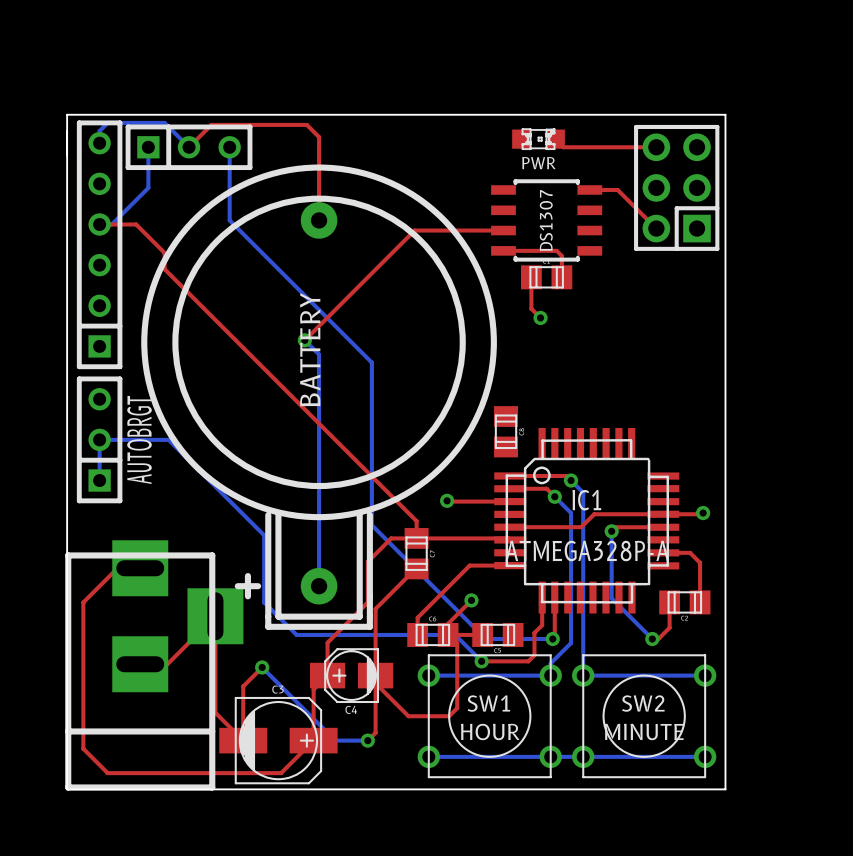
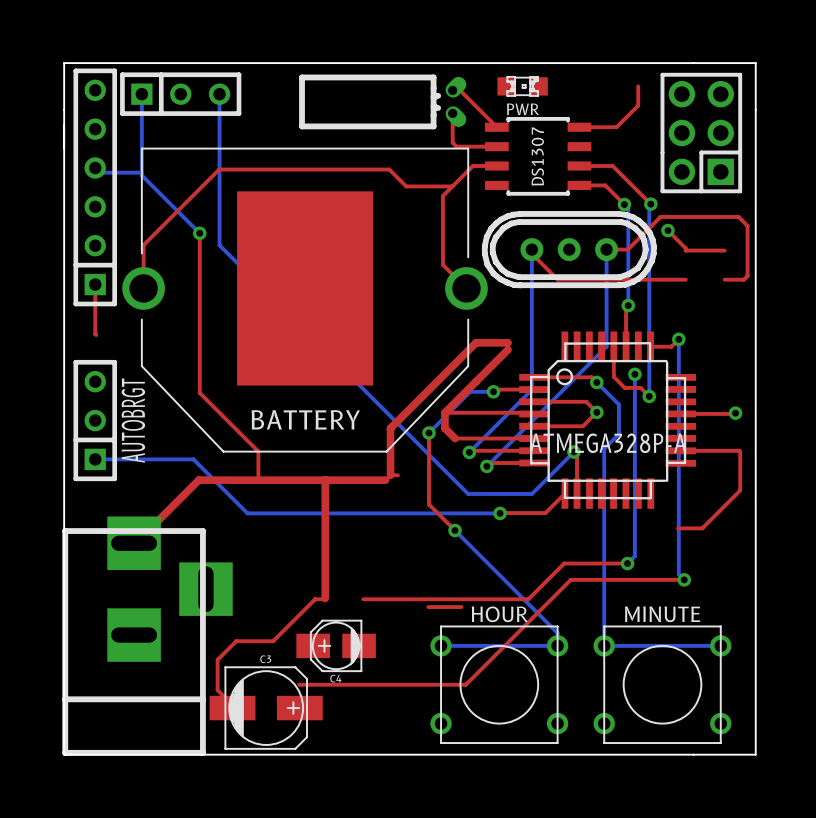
top track: none -> (638, 86) (638, 105) (616, 127) (579, 127)
top track: none -> (452, 90) (460, 90) (496, 127)
bottom track: none -> (141, 94) (141, 140)
bottom track: none -> (219, 94) (219, 140)
part: none -> (382, 101)
board edge: (67, 114) (725, 114) (725, 789) -> (64, 109) (64, 63) (755, 63) (755, 754) (693, 754)
top track: none -> (452, 113) (452, 142) (456, 146) (496, 146)
part position: (538, 139) -> (522, 86)
top track: (555, 139) (563, 147) (656, 147) -> none
bottom track: (99, 143) (99, 131) (107, 122) (164, 122) (189, 147) -> none
top track: (189, 147) (211, 124) (306, 124) (319, 137) (319, 220) -> none
part position: (189, 147) -> (180, 94)
top track: none -> (496, 166) (472, 166) (442, 195) (442, 264) (466, 288)
top track: none -> (579, 166) (612, 166) (650, 204)
bottom track: none -> (95, 167) (99, 172) (141, 172)
bottom track: (148, 183) (148, 187) (111, 224) (99, 224) -> (141, 175) (199, 233)
part position: (676, 187) -> (701, 133)
top track: (589, 189) (617, 189) (656, 228) -> none
top track: none -> (579, 185) (605, 185) (624, 204)
top track: none -> (452, 186) (406, 186) (389, 169) (219, 169) (143, 245) (143, 288)
bottom track: none -> (624, 204) (628, 208) (628, 305)
via: none -> (624, 204)
bottom track: none -> (650, 204) (649, 205) (649, 396)
via: none -> (650, 204)
bottom track: (229, 220) (371, 362) (371, 525) (485, 639) (552, 639) -> (219, 210) (219, 245) (468, 493) (531, 493) (573, 452)
part position: (546, 220) -> (538, 156)
top track: (99, 224) (136, 224) (164, 252) (164, 269) (416, 521) (416, 538) -> none
top track: (503, 230) (414, 230) (304, 340) -> none
top track: none -> (667, 230) (685, 250) (724, 250)
via: none -> (667, 230)
part position: (99, 244) -> (95, 187)
top track: none -> (199, 233) (199, 392) (258, 451) (258, 480)
via: none -> (199, 233)
top track: (503, 250) (556, 250) (561, 255) (561, 277) -> none
bottom track: none -> (531, 249) (531, 389) (469, 452)
top track: none -> (531, 249) (531, 253) (557, 279) (685, 279)
part: none -> (569, 249)
bottom track: none -> (606, 249) (606, 346) (486, 466)
top track: none -> (606, 249) (627, 249) (660, 216) (738, 216) (747, 225) (747, 276) (743, 279) (724, 279)
top track: (531, 277) (531, 308) (540, 317) -> none
part: (546, 277) -> none
top track: none -> (95, 284) (96, 335)
part: none -> BATTERY (305, 300)
via: (540, 317) -> none
top track: none -> (628, 305) (626, 307) (626, 346)
via: none -> (628, 305)
bottom track: (304, 340) (319, 354) (319, 586) -> none
via: (304, 340) -> none
bottom track: none -> (678, 339) (678, 574) (684, 579)
top track: none -> (678, 339) (671, 346) (650, 346)
via: none -> (678, 339)
top track: none -> (613, 346) (613, 376) (624, 387) (640, 387) (649, 396)
bottom track: none -> (634, 374) (634, 556) (627, 563)
via: none -> (634, 374)
top track: none -> (534, 377) (591, 377) (596, 382)
part: BATTERY (319, 397) -> none
bottom track: none -> (596, 382) (618, 404) (618, 434) (604, 448) (604, 645)
via: none -> (596, 382)
top track: none -> (534, 389) (495, 389) (493, 391)
bottom track: none -> (493, 391) (470, 391) (428, 432)
via: none -> (493, 391)
via: none -> (649, 396)
top track: none -> (534, 401) (586, 401) (596, 412) (582, 426) (534, 426)
top track: none -> (444, 412) (534, 414)
top track: none -> (444, 412) (444, 428) (455, 438) (534, 438)
top track: none -> (444, 412) (508, 349) (508, 342) (476, 342) (390, 428) (390, 475)
part: (506, 431) -> none
via: none -> (596, 412)
top track: none -> (735, 413) (680, 413)
via: none -> (735, 413)
part: none -> ATMEGA328P-A (607, 420)
top track: none -> (428, 432) (428, 504) (455, 530)
via: none -> (428, 432)
top track: none -> (534, 450) (471, 450) (469, 452)
top track: none -> (680, 450) (739, 450) (740, 490) (702, 528) (678, 528)
top track: none -> (573, 452) (577, 455) (577, 493)
via: none -> (573, 452)
via: none -> (469, 452)
top track: (510, 475) (566, 475) (571, 480) -> none
bottom track: (99, 480) (99, 439) (168, 439) (264, 535) (264, 602) (296, 634) (455, 634) (481, 661) -> (95, 459) (193, 459) (247, 513) (500, 513)
bottom track: (571, 480) (583, 492) (583, 662) -> (455, 530) (557, 633)
via: (571, 480) -> none
top track: none -> (534, 463) (490, 463) (486, 466)
via: none -> (486, 466)
top track: (510, 488) (546, 488) (554, 496) -> none
bottom track: (554, 496) (571, 513) (571, 643) (550, 663) (550, 675) -> none
via: (554, 496) -> none
top track: none -> (390, 475) (397, 475)
top track: (447, 500) (510, 501) -> none
via: (447, 500) -> none
top track: none -> (325, 480) (325, 598) (315, 599) (273, 641) (236, 641) (217, 659) (217, 690) (227, 700) (249, 700)
top track: (703, 513) (594, 514) (581, 527) (510, 527) -> none
via: (703, 513) -> none
top track: none -> (564, 493) (545, 513) (500, 513)
IC1: ATMEGA328P-A (586, 520) -> none
top track: (663, 527) (615, 527) (611, 531) -> none
bottom track: (611, 531) (611, 598) (652, 639) -> none
via: (611, 531) -> none
via: none -> (500, 513)
top track: (510, 539) (508, 538) (391, 538) (367, 561) (367, 602) (327, 642) (327, 675) (313, 689) (313, 740) (281, 773) (107, 773) (83, 748) (83, 602) (117, 568) (140, 568) -> (390, 475) (385, 480) (198, 480) (134, 543)
top track: (663, 552) (690, 552) (700, 562) (700, 602) -> none
part: (416, 553) -> none
via: none -> (455, 530)
top track: (510, 565) (469, 565) (417, 617) (417, 634) -> none
top track: (416, 568) (375, 608) (375, 732) (367, 740) -> none
top track: none -> (627, 563) (564, 563) (528, 599) (363, 599)
via: none -> (627, 563)
top track: (542, 597) (542, 625) (534, 632) (534, 655) (528, 661) (481, 661) -> none
top track: (554, 597) (554, 636) (552, 639) -> none
top track: (471, 600) (448, 623) (448, 634) (457, 644) (457, 708) (449, 716) -> (684, 579) (570, 579) (465, 684) (429, 684)
via: (471, 600) -> none
top track: (669, 602) (669, 627) (658, 639) (652, 639) -> none
part: (684, 602) -> none
via: none -> (684, 579)
part: (432, 634) -> none
part: (497, 634) -> none
via: (552, 639) -> none
via: (652, 639) -> none
via: (481, 661) -> none
top track: (140, 664) (167, 664) (215, 616) (215, 712) (243, 740) (243, 686) (262, 667) -> none
bottom track: (262, 667) (335, 740) (367, 740) -> none
via: (262, 667) -> none
bottom track: (428, 675) (461, 675) -> none
bottom track: (583, 675) (632, 675) -> (557, 645) (526, 645)
bottom track: none -> (674, 645) (720, 645)
top track: (375, 683) (408, 716) -> (299, 684) (390, 684)
SW1: HOUR (489, 716) -> none
part: none -> HOUR (499, 684)
SW2: MINUTE (644, 716) -> none
part: none -> MINUTE (662, 684)
via: (367, 740) -> none
bottom track: (428, 756) (705, 756) -> none

